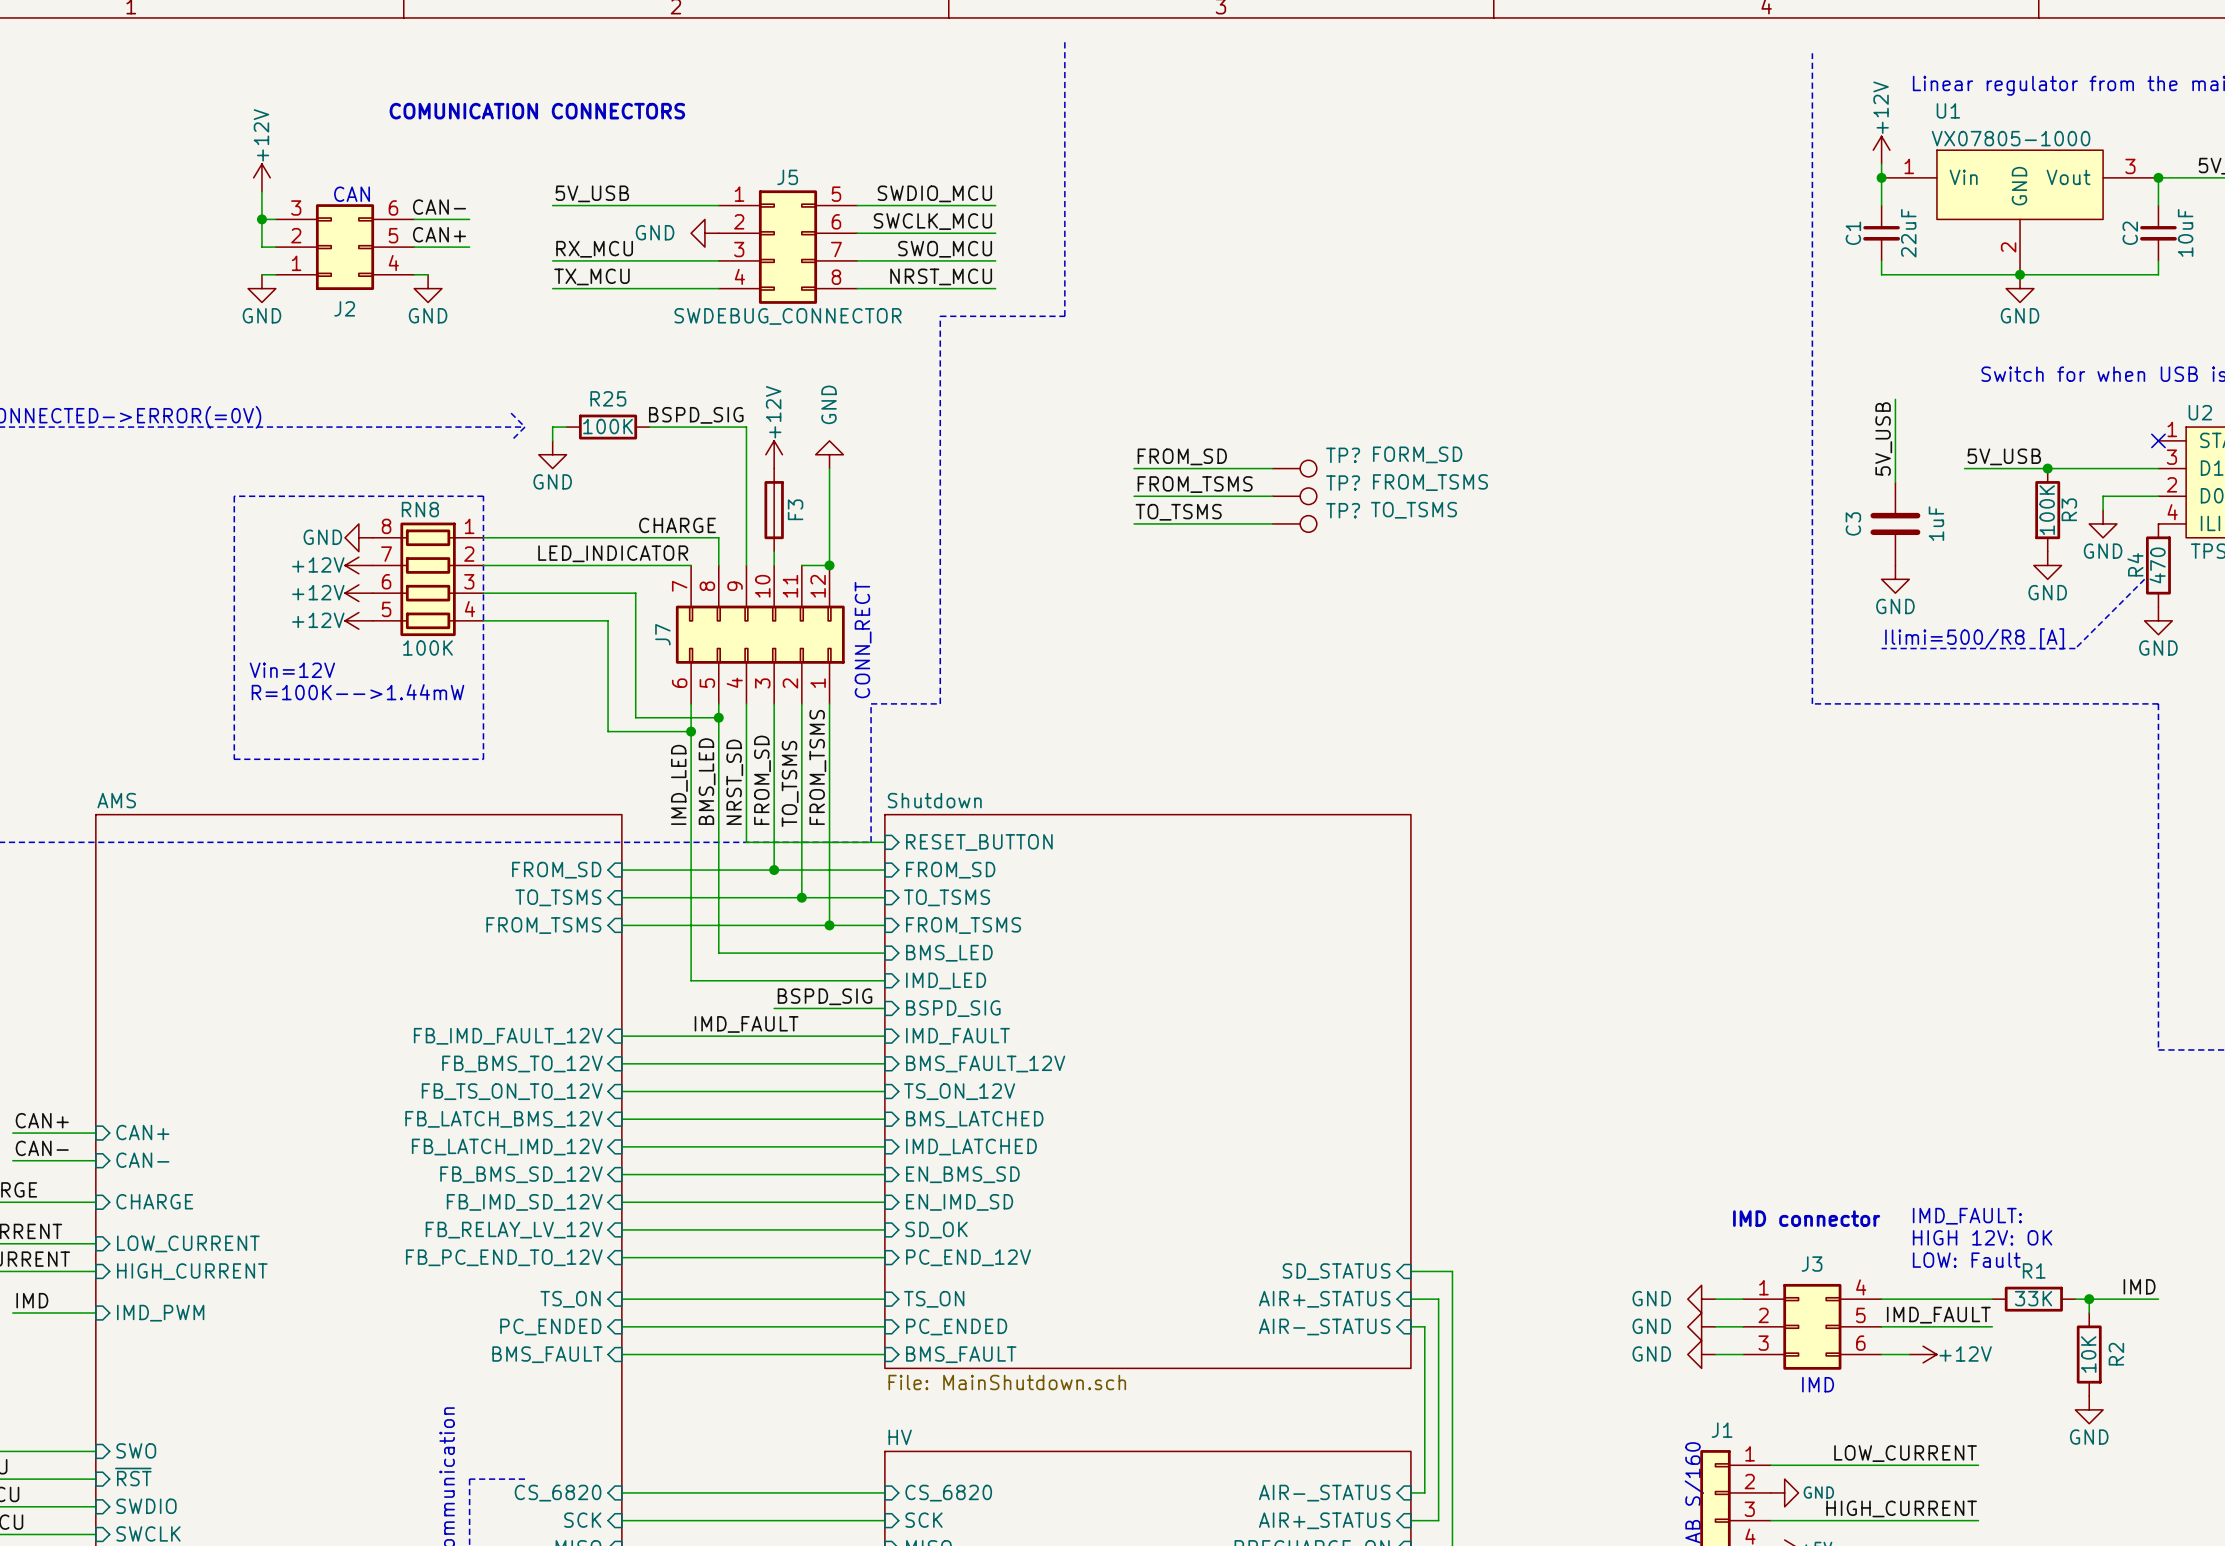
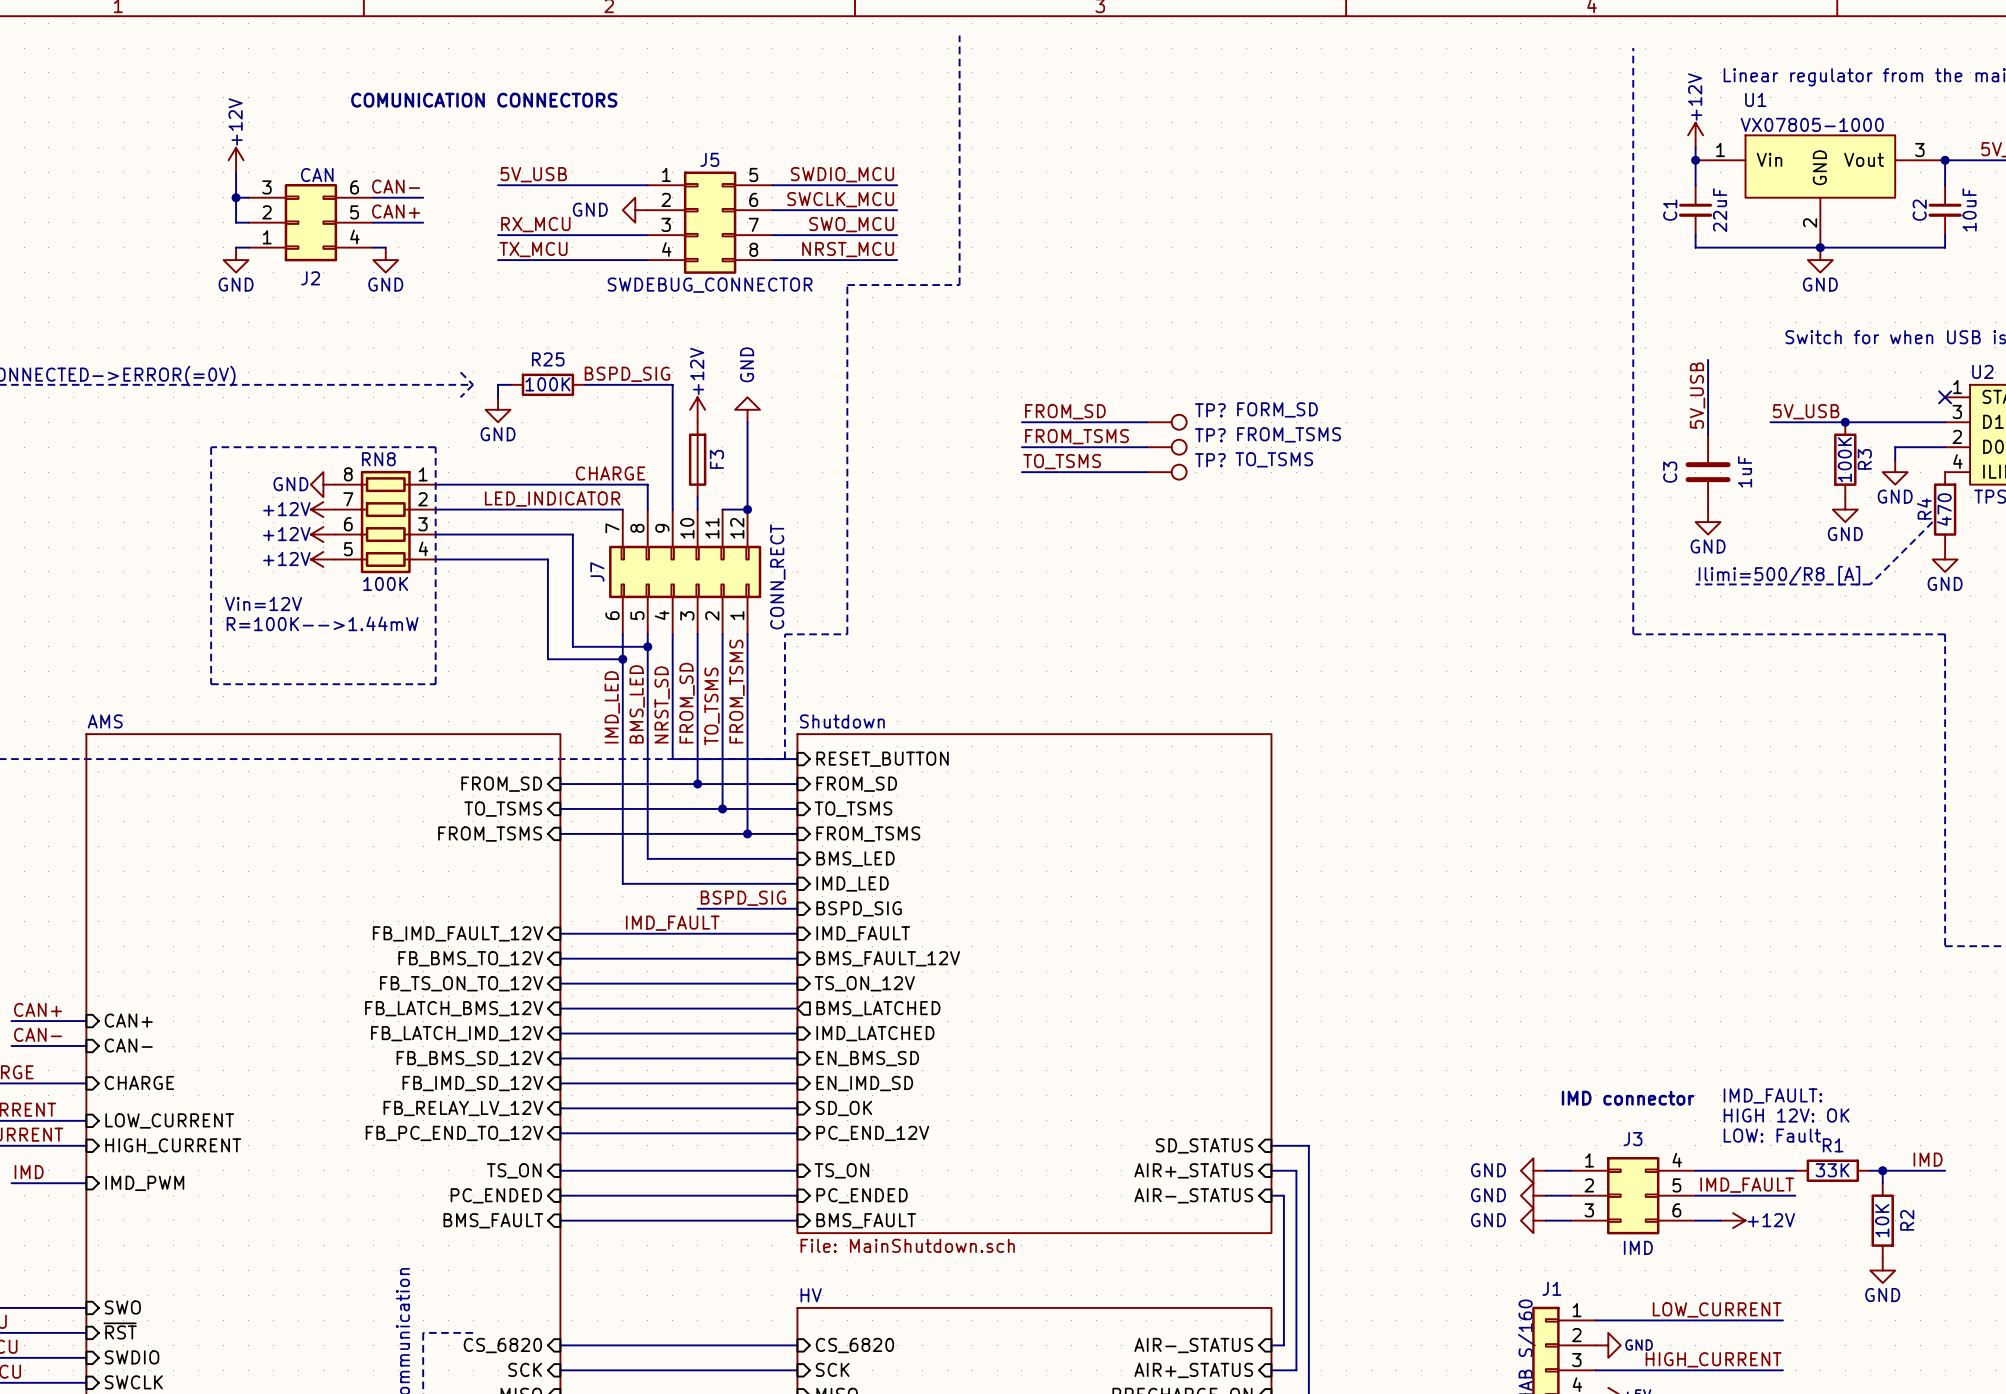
sheet pin shape: input (974, 1119) -> output (878, 1008)

